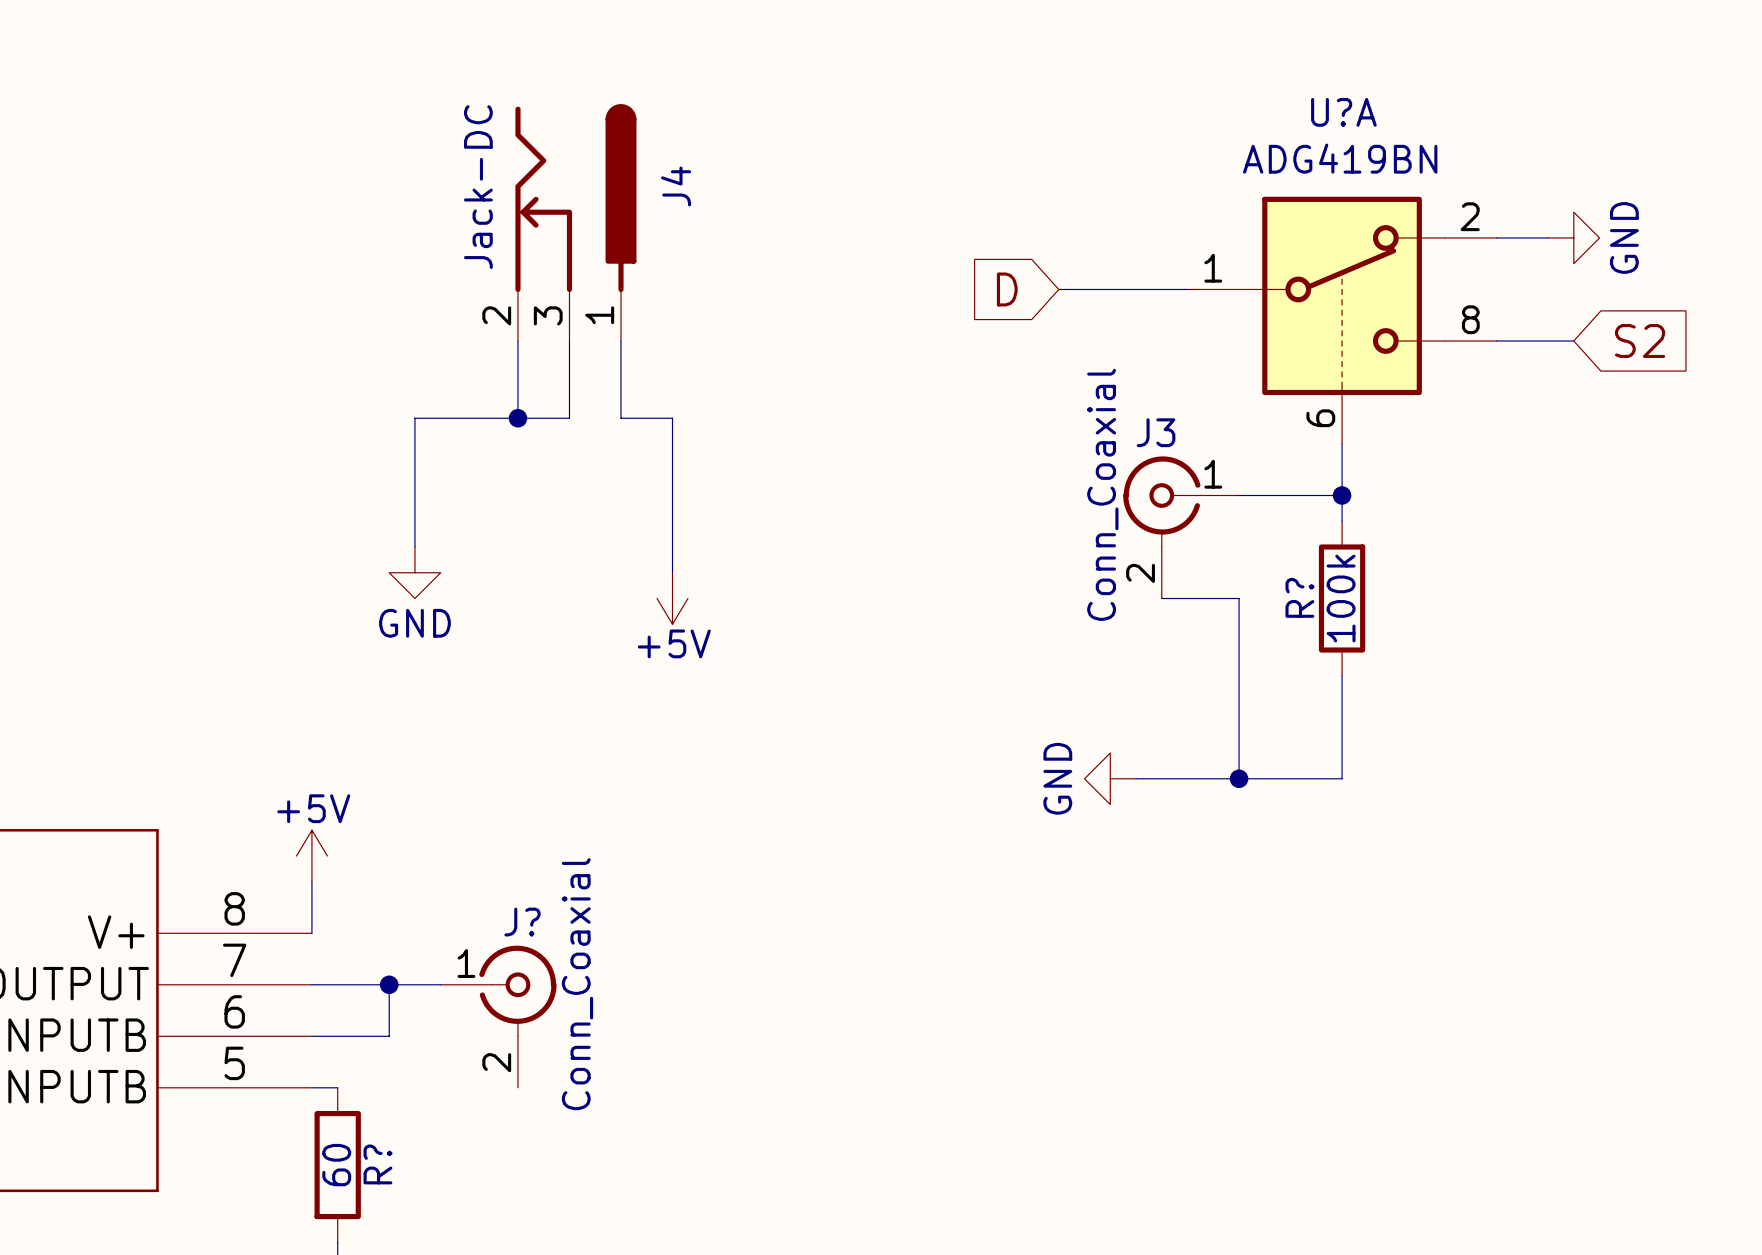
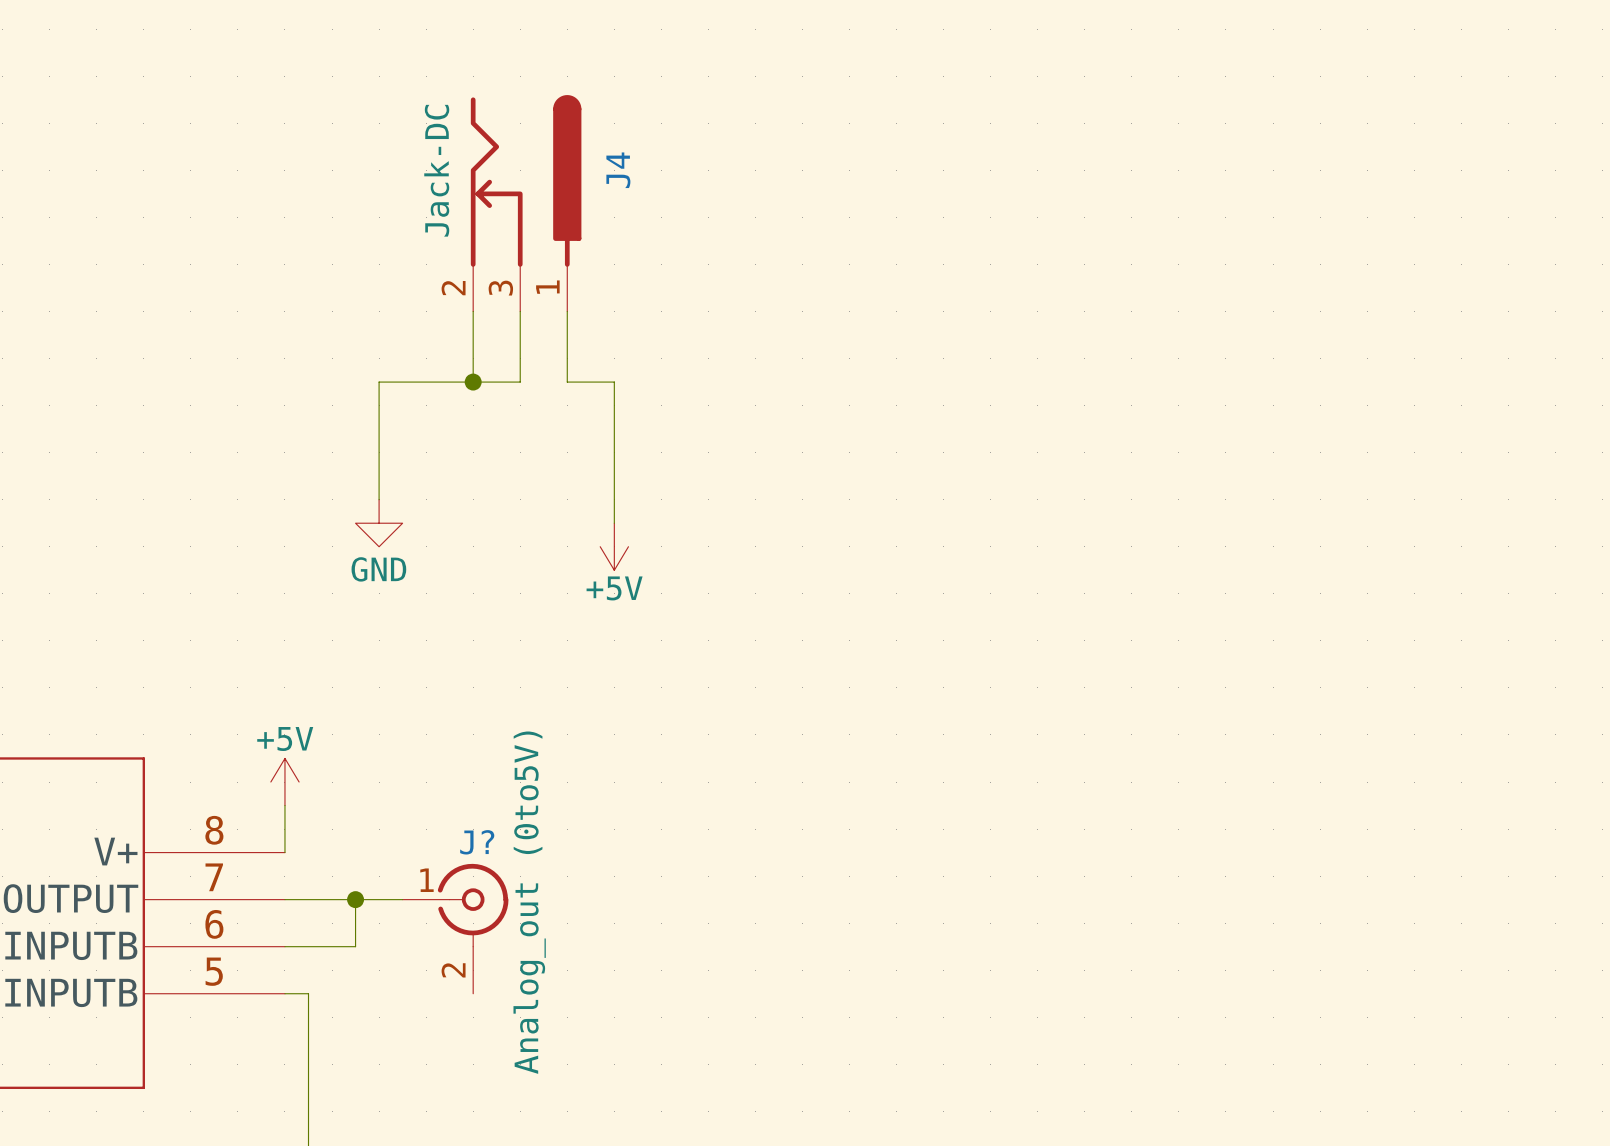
wire: (1496, 237) (1548, 237) -> none
power symbol: GND (1573, 237) -> none
global label: D (1007, 289) -> none
wire: (1058, 289) (1187, 289) -> none
U?A: ADG419BN (1342, 320) -> none
wire: (1496, 340) (1573, 340) -> none
global label: S2 (1640, 340) -> none
wire: (1342, 443) (1342, 521) -> none
wire: (1239, 495) (1342, 495) -> none
junction: (1342, 495) -> none
J3: Conn_Coaxial (1181, 527) -> none
wire: (1161, 598) (1239, 598) (1239, 778) -> none
R?: 100k (1342, 598) -> none
wire: (1342, 675) (1342, 778) (1136, 778) -> none
power symbol: GND (1110, 778) -> none
junction: (1239, 778) -> none
J? value: Conn_Coaxial (577, 984) -> Analog_out (0to5V) (529, 902)
wire: none -> (308, 993) (308, 1134)
R?: 60 (337, 1165) -> none

